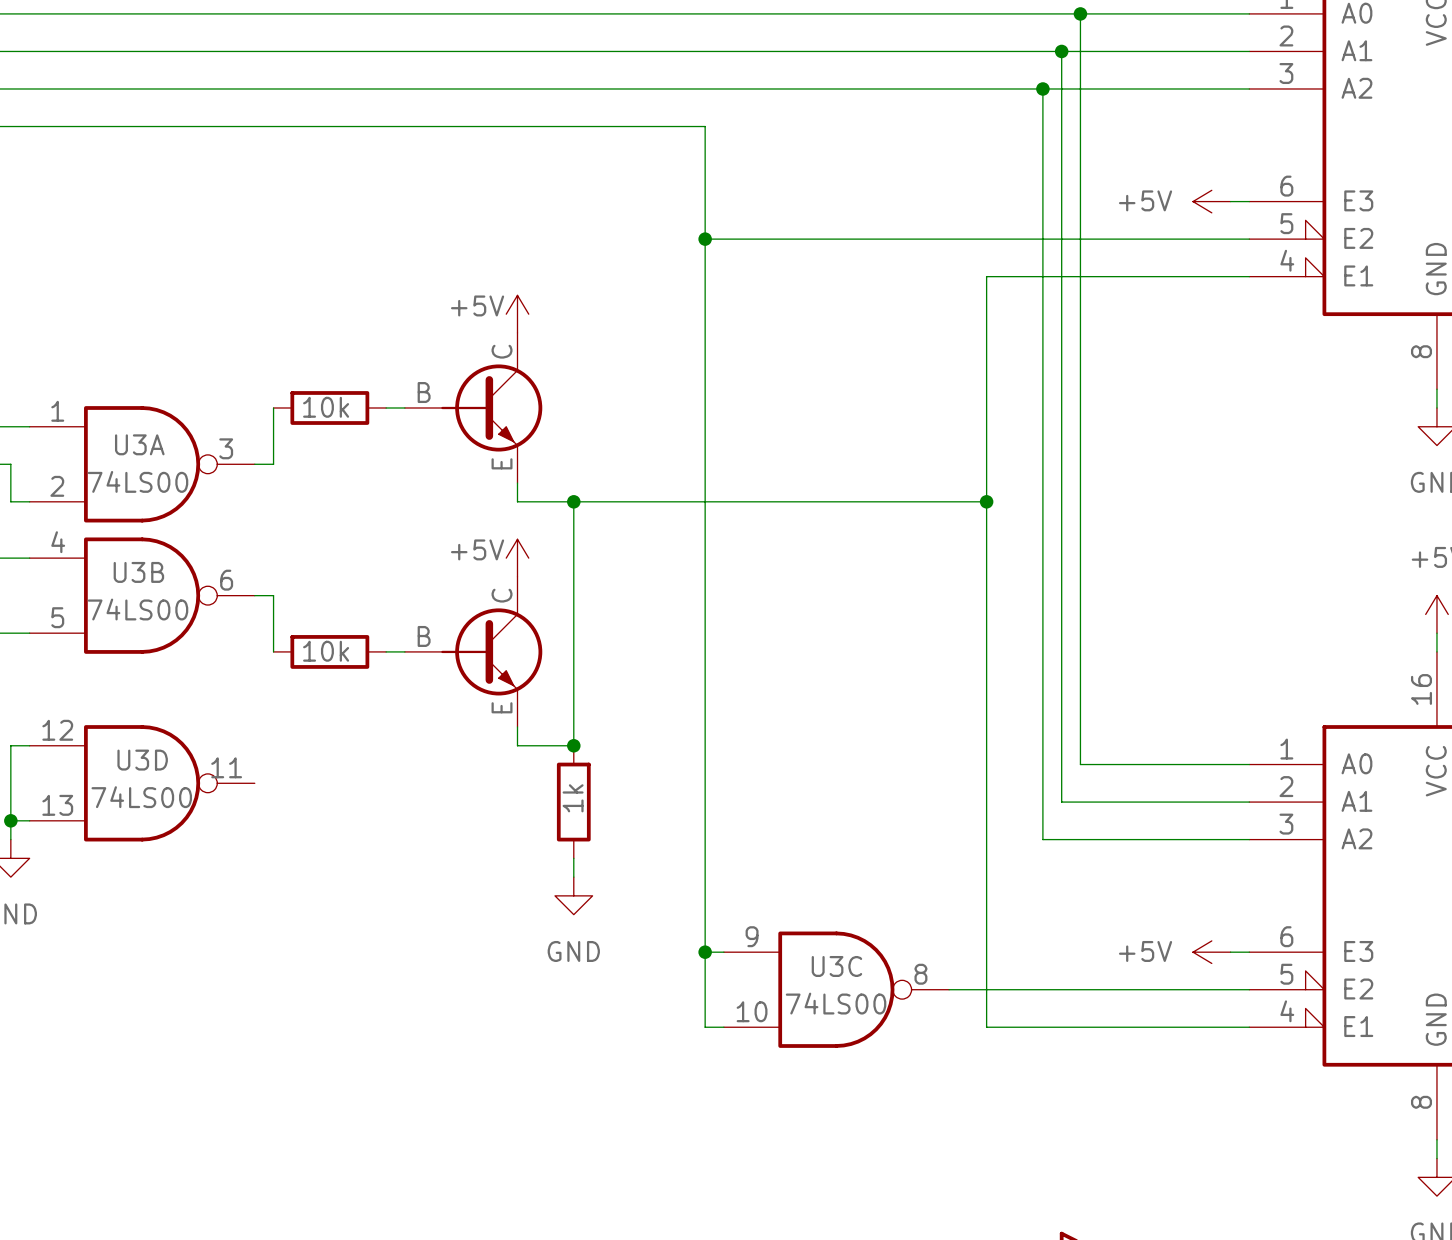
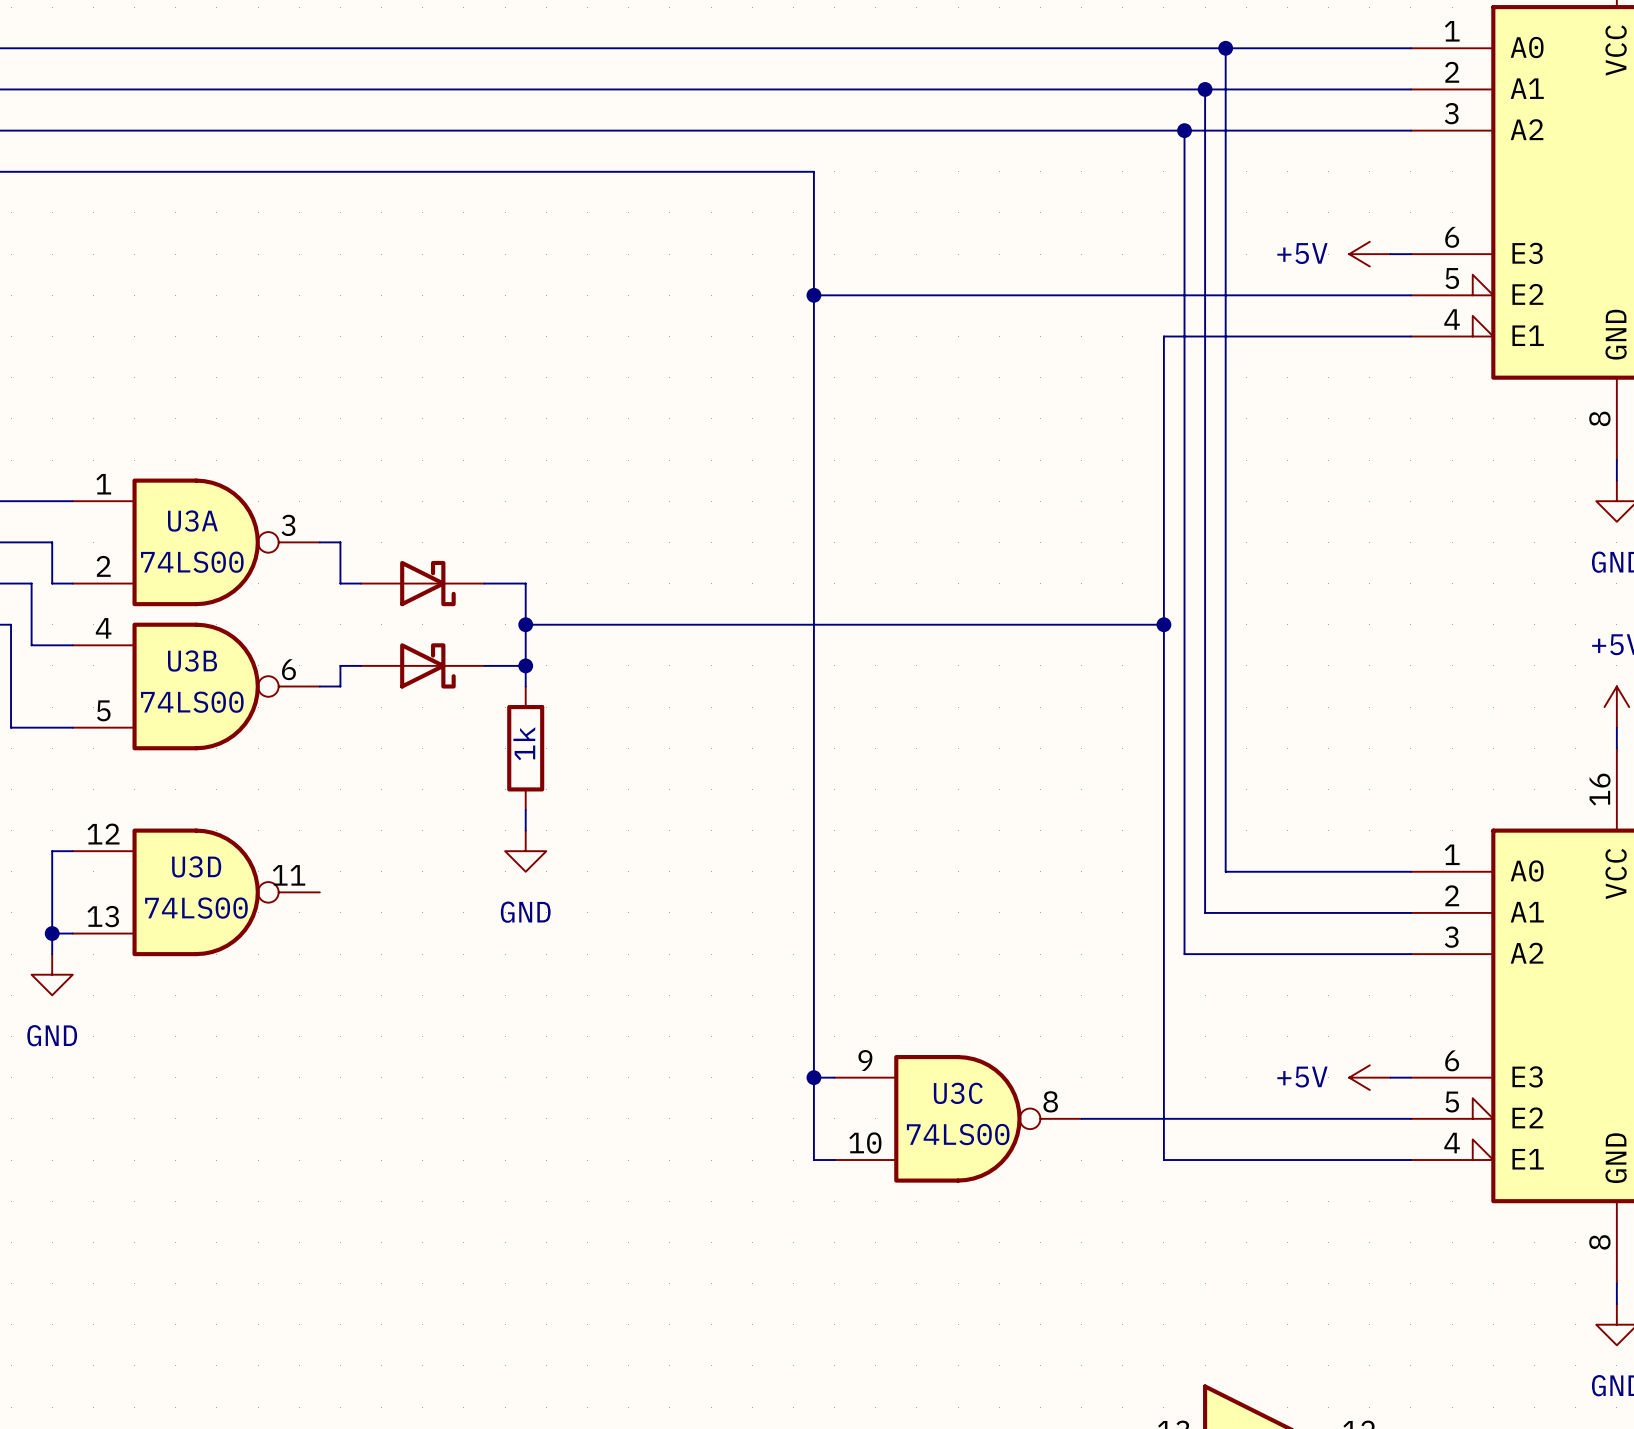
wire: (1024, 276) (986, 276) (986, 1027) (1024, 1027) -> (1163, 336) (1163, 1160)
power symbol: +5V (517, 314) -> none
wire: (273, 407) (273, 464) -> (361, 583) (340, 583) (340, 542)
part: 10k (329, 407) -> none
wire: (386, 407) (404, 407) -> none
part: (473, 407) -> none
wire: (517, 483) (517, 501) (986, 501) -> none
part: none -> (422, 583)
wire: none -> (484, 583) (525, 583) (525, 686)
wire: (573, 501) (573, 745) (517, 745) (517, 727) -> none
junction: (573, 501) -> none
junction position: (986, 501) -> (1163, 624)
wire: none -> (525, 624) (1163, 624)
junction: none -> (525, 624)
power symbol: +5V (517, 558) -> none
part: none -> (422, 665)
wire: none -> (484, 665) (525, 665)
junction: none -> (525, 665)
wire: (273, 595) (273, 651) -> (340, 686) (340, 665) (361, 665)
part: 10k (329, 651) -> none
wire: (386, 651) (404, 651) -> none
part: (473, 651) -> none
junction: (573, 745) -> none
part position: (573, 802) -> (525, 748)
wire: (573, 858) (573, 877) -> (525, 810) (525, 830)
power symbol position: GND (573, 895) -> GND (525, 851)

